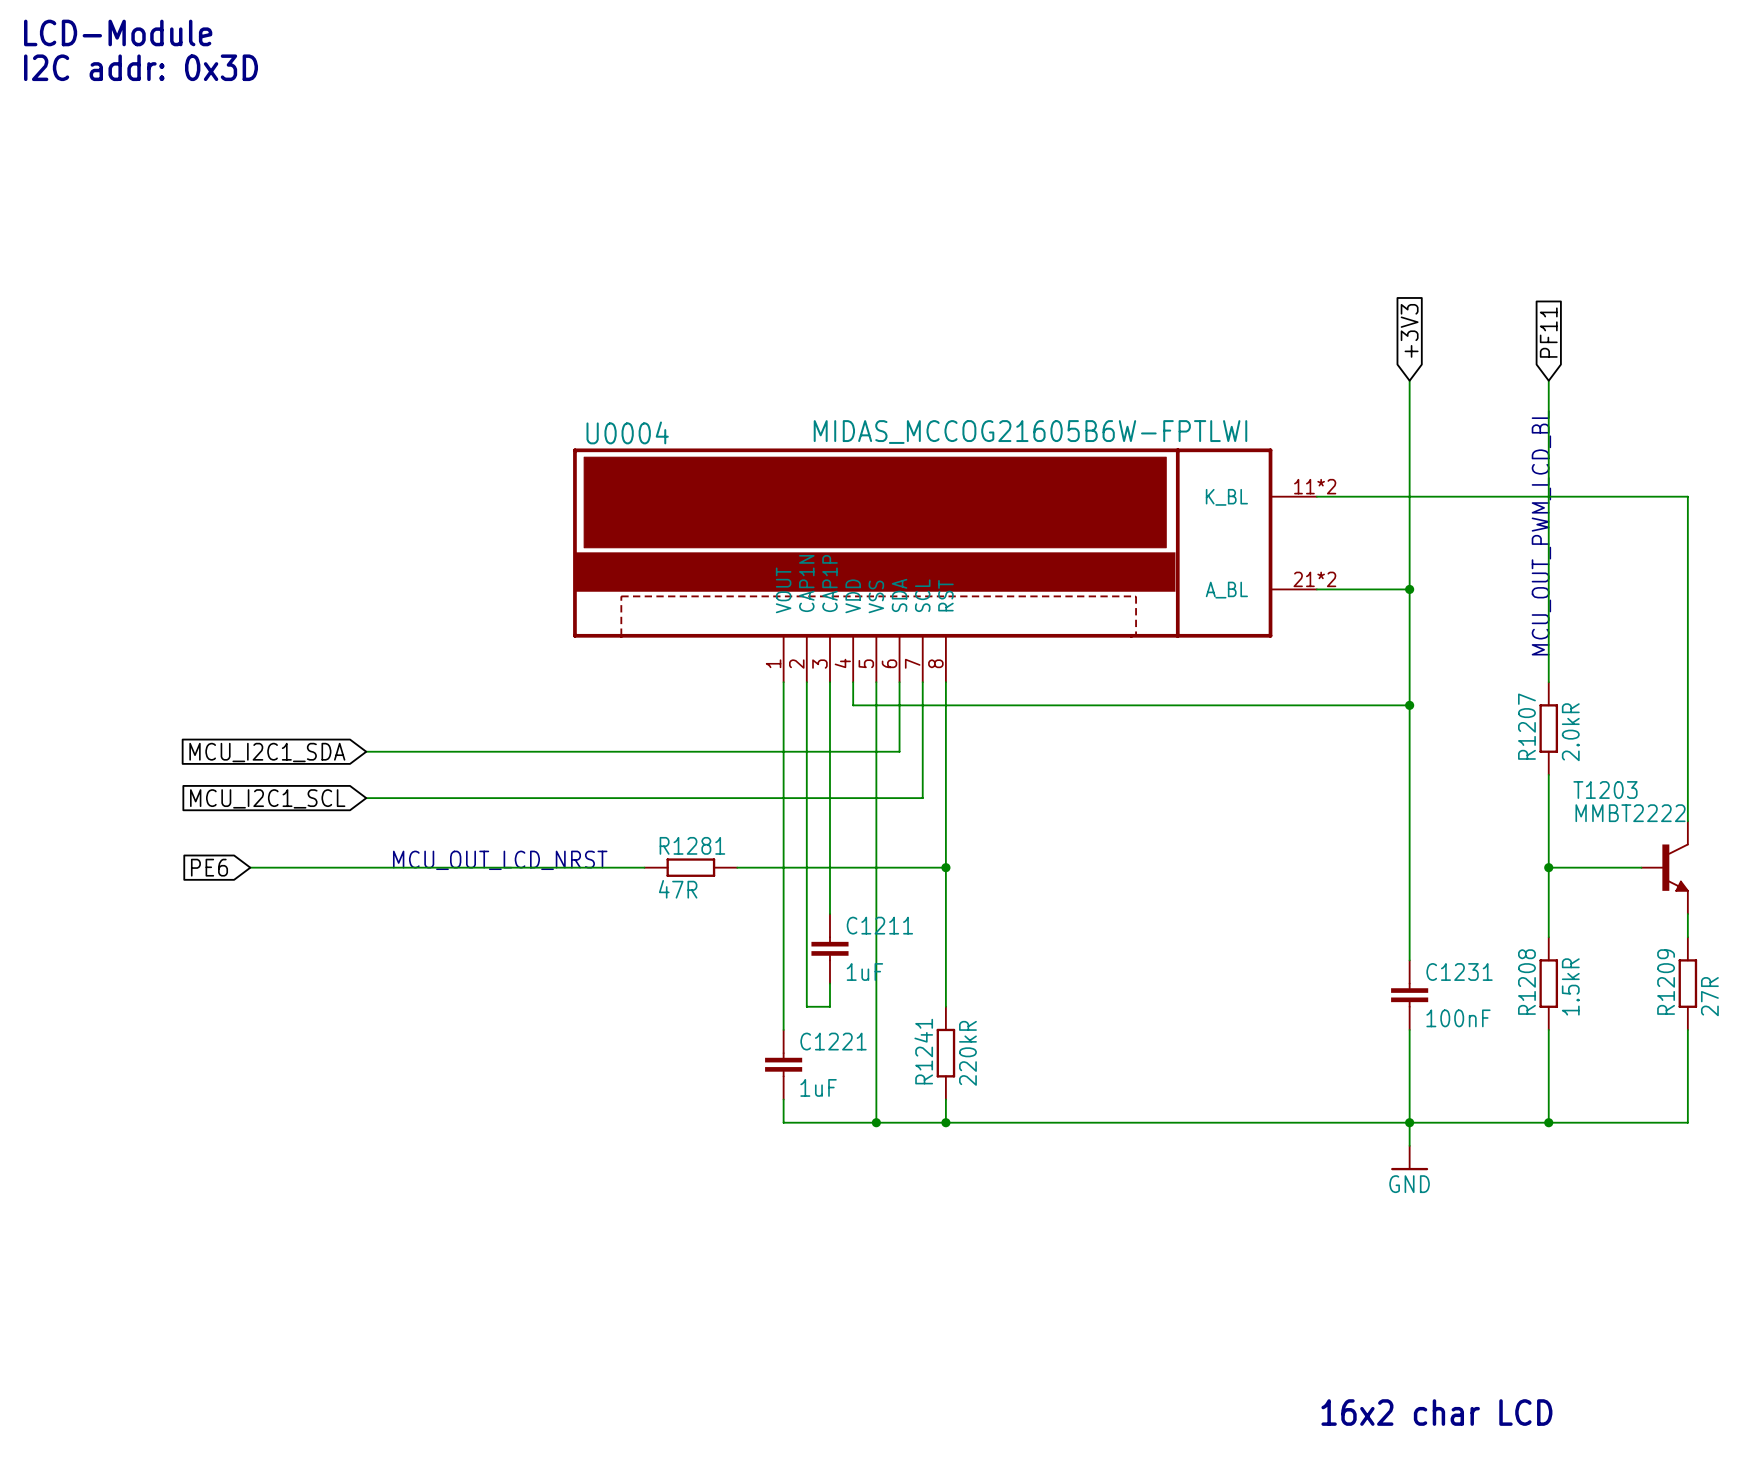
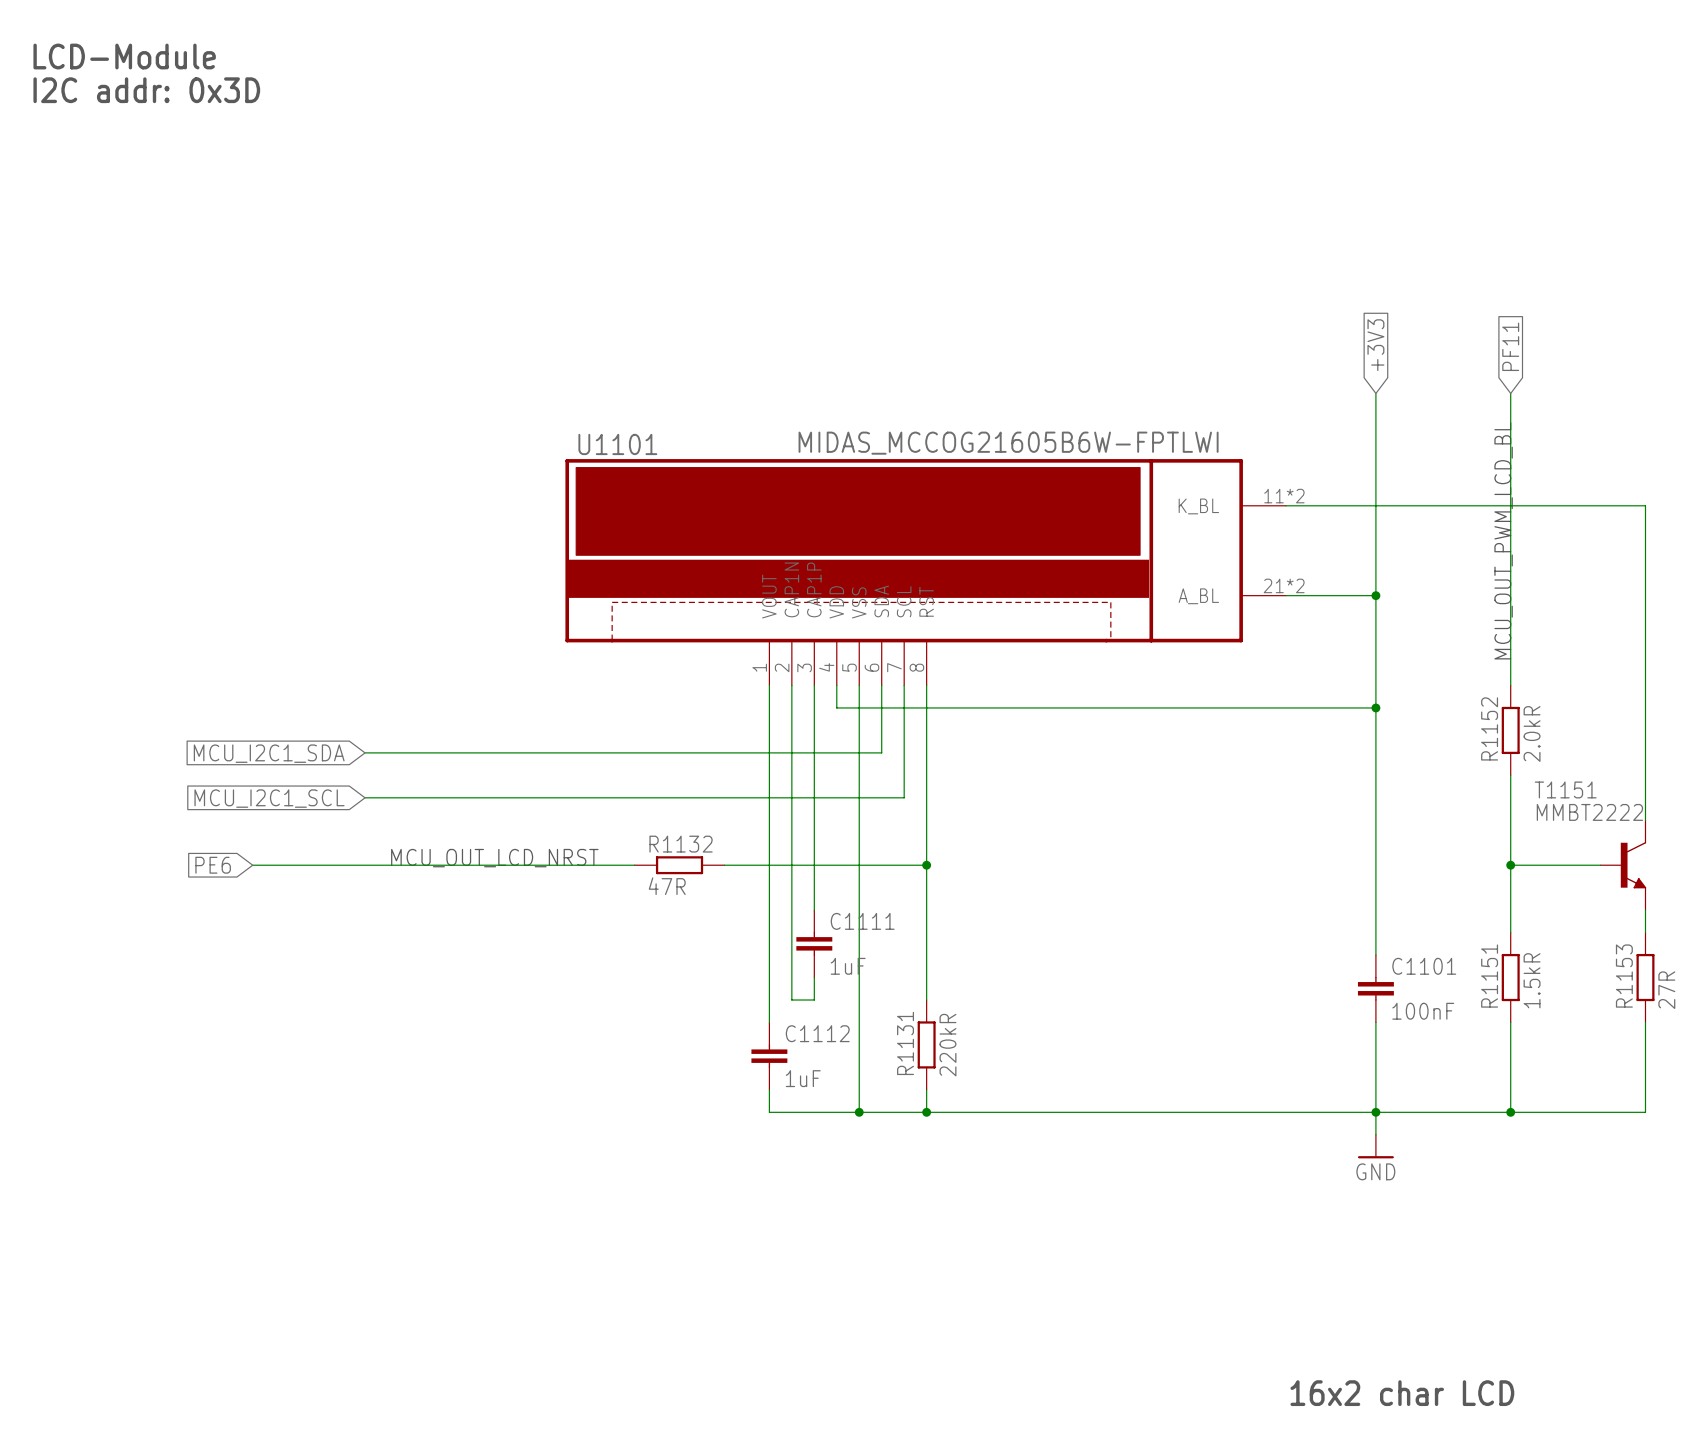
U0004 name: U0004 (627, 432) -> U1101 (617, 444)
R1207 name: R1207 (1526, 726) -> R1152 (1489, 728)
T1203 name: T1203 (1605, 789) -> T1151 (1565, 789)
R1281 name: R1281 (692, 845) -> R1132 (681, 844)
C1211 name: C1211 (879, 925) -> C1111 (862, 921)
C1231 name: C1231 (1459, 972) -> C1101 (1424, 966)
R1208 name: R1208 (1526, 982) -> R1151 (1489, 976)
R1209 name: R1209 (1666, 982) -> R1153 (1624, 976)
C1221 name: C1221 (833, 1041) -> C1112 (817, 1033)
R1241 name: R1241 (923, 1051) -> R1131 (905, 1043)

